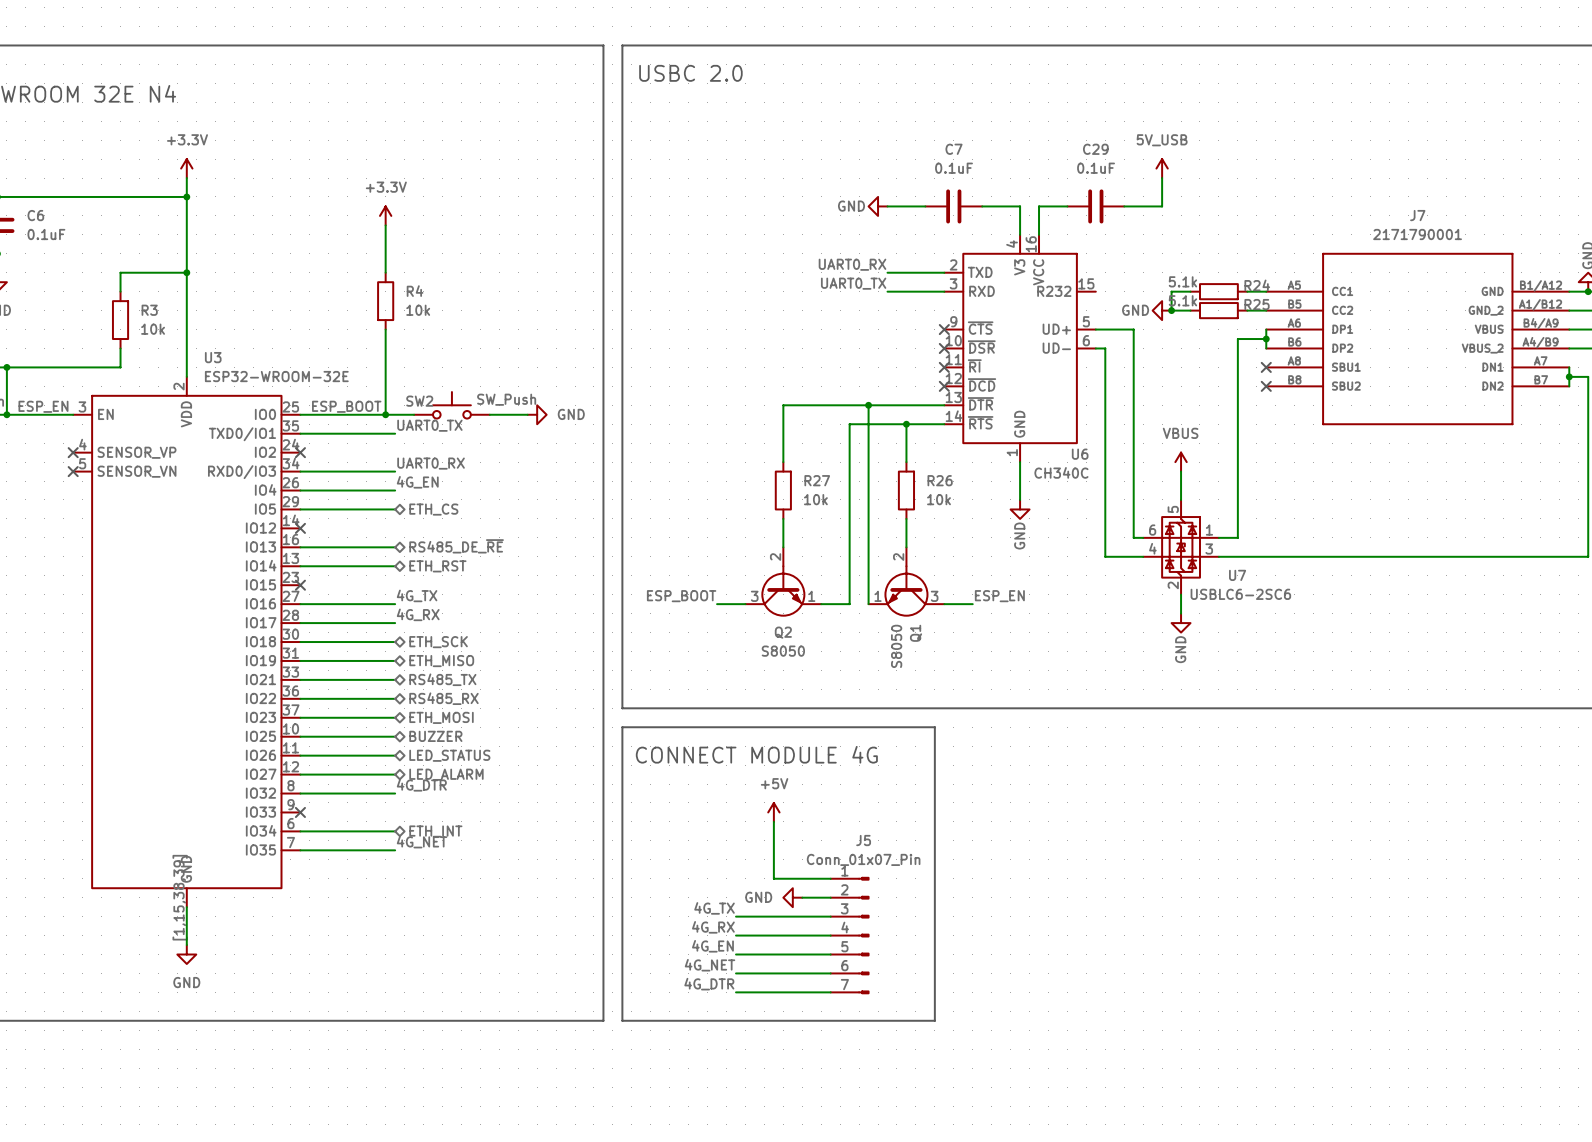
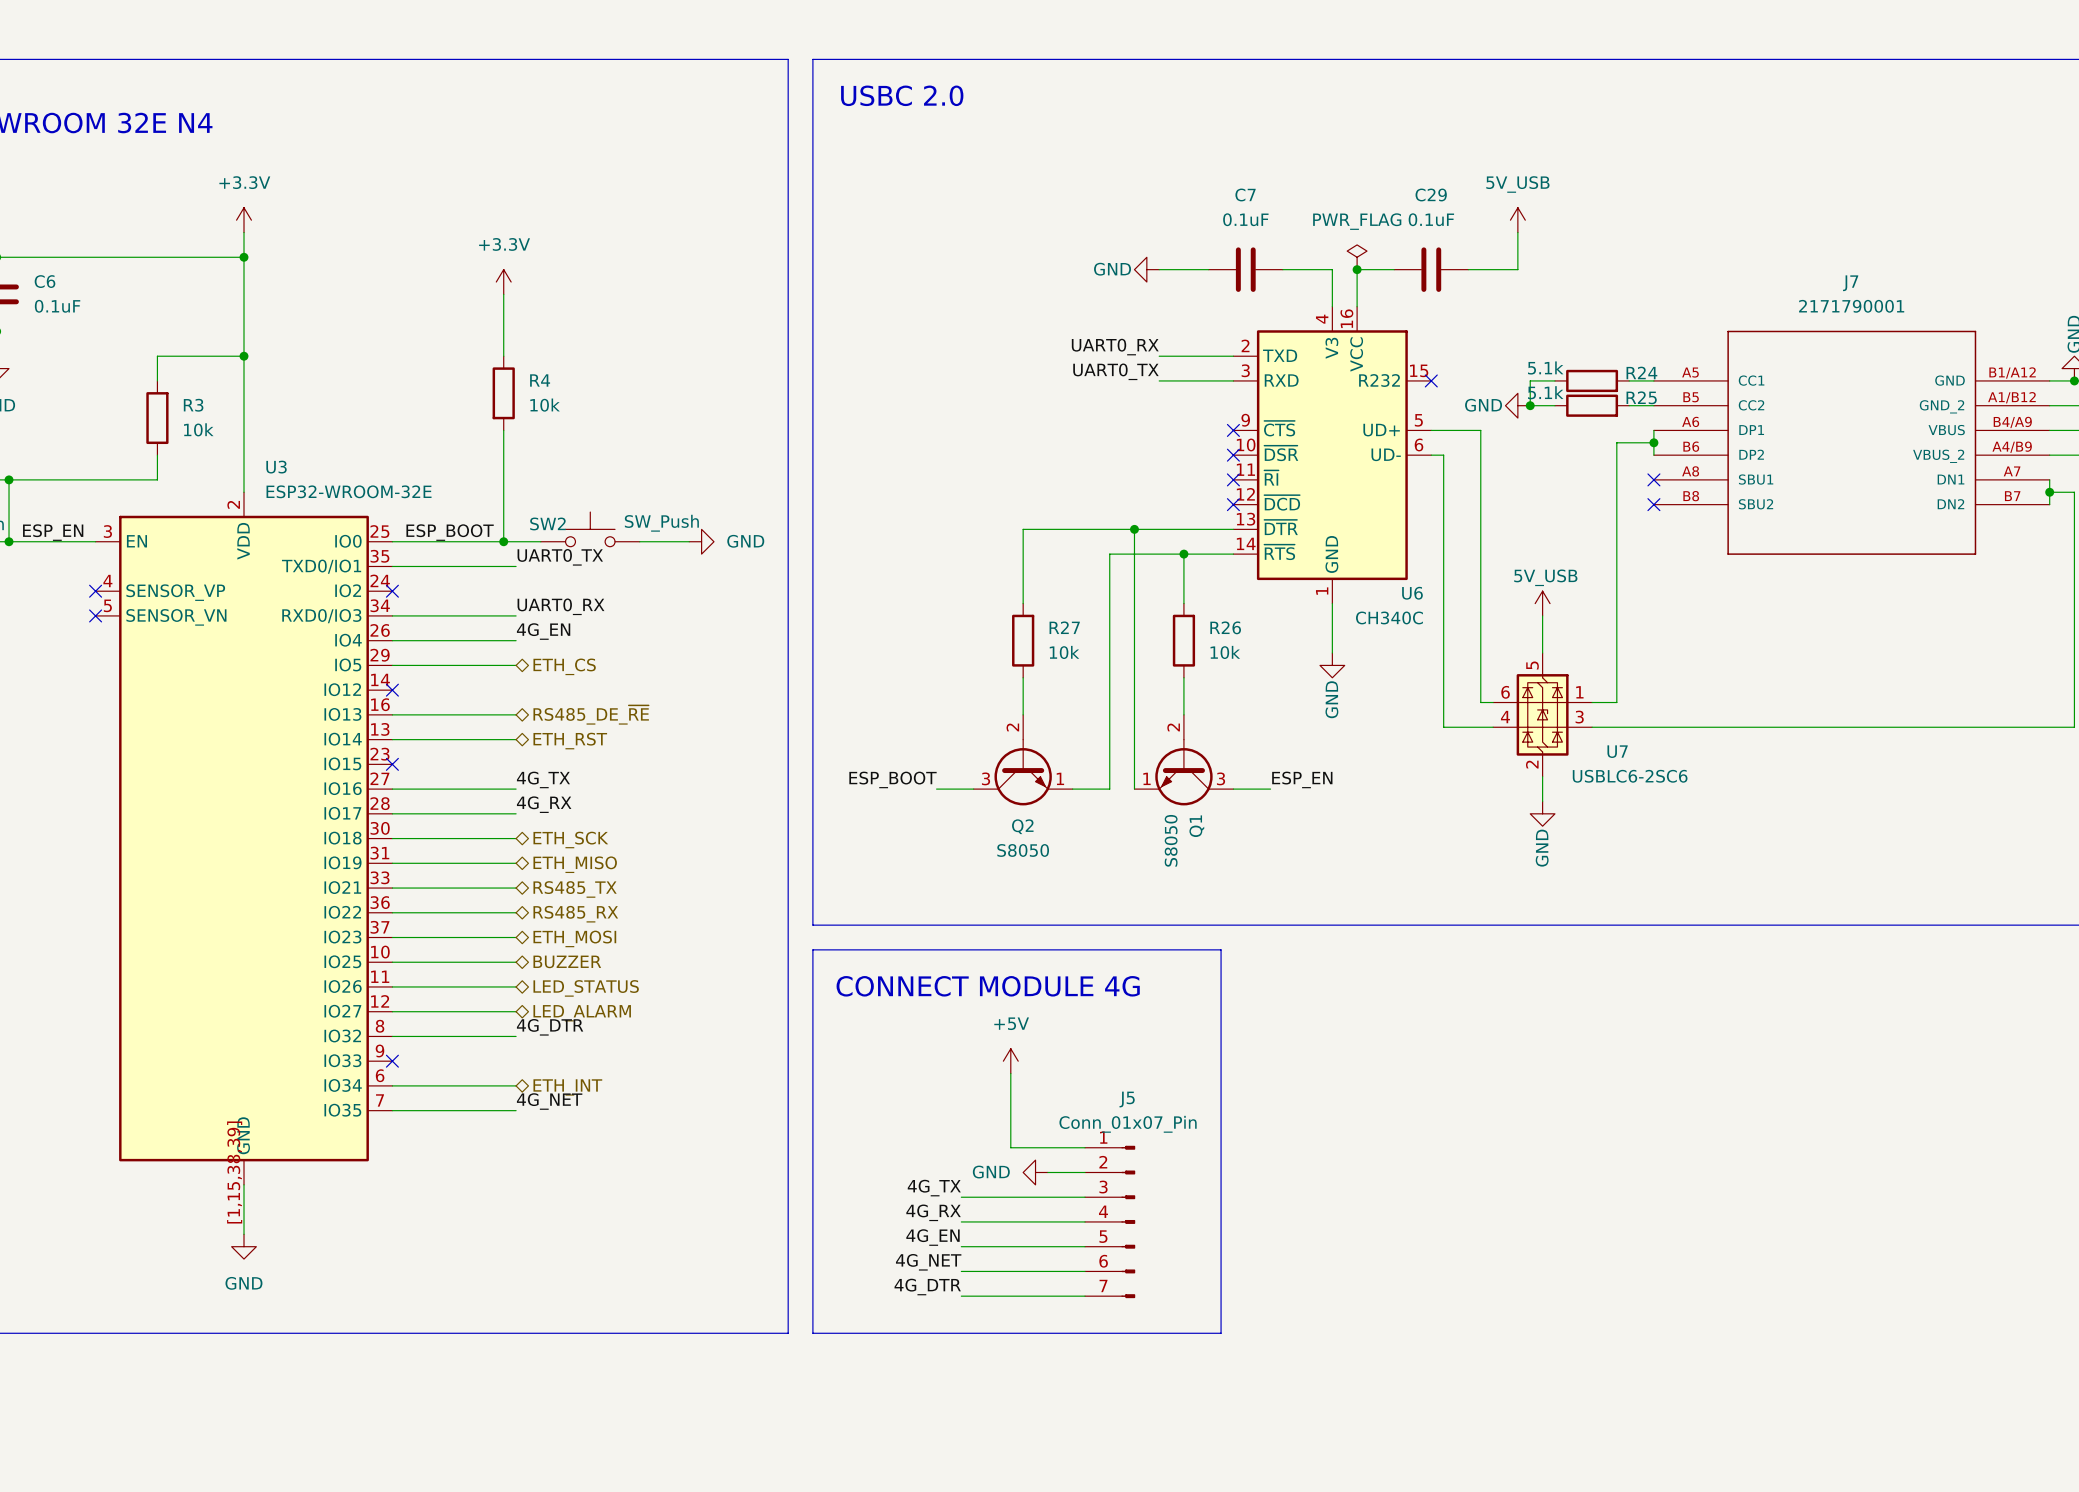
power symbol: none -> PWR_FLAG (1357, 257)
junction: none -> (1357, 269)
no-connect mark: none -> (1431, 380)
power symbol: VBUS (1181, 462) -> 5V_USB (1542, 603)

